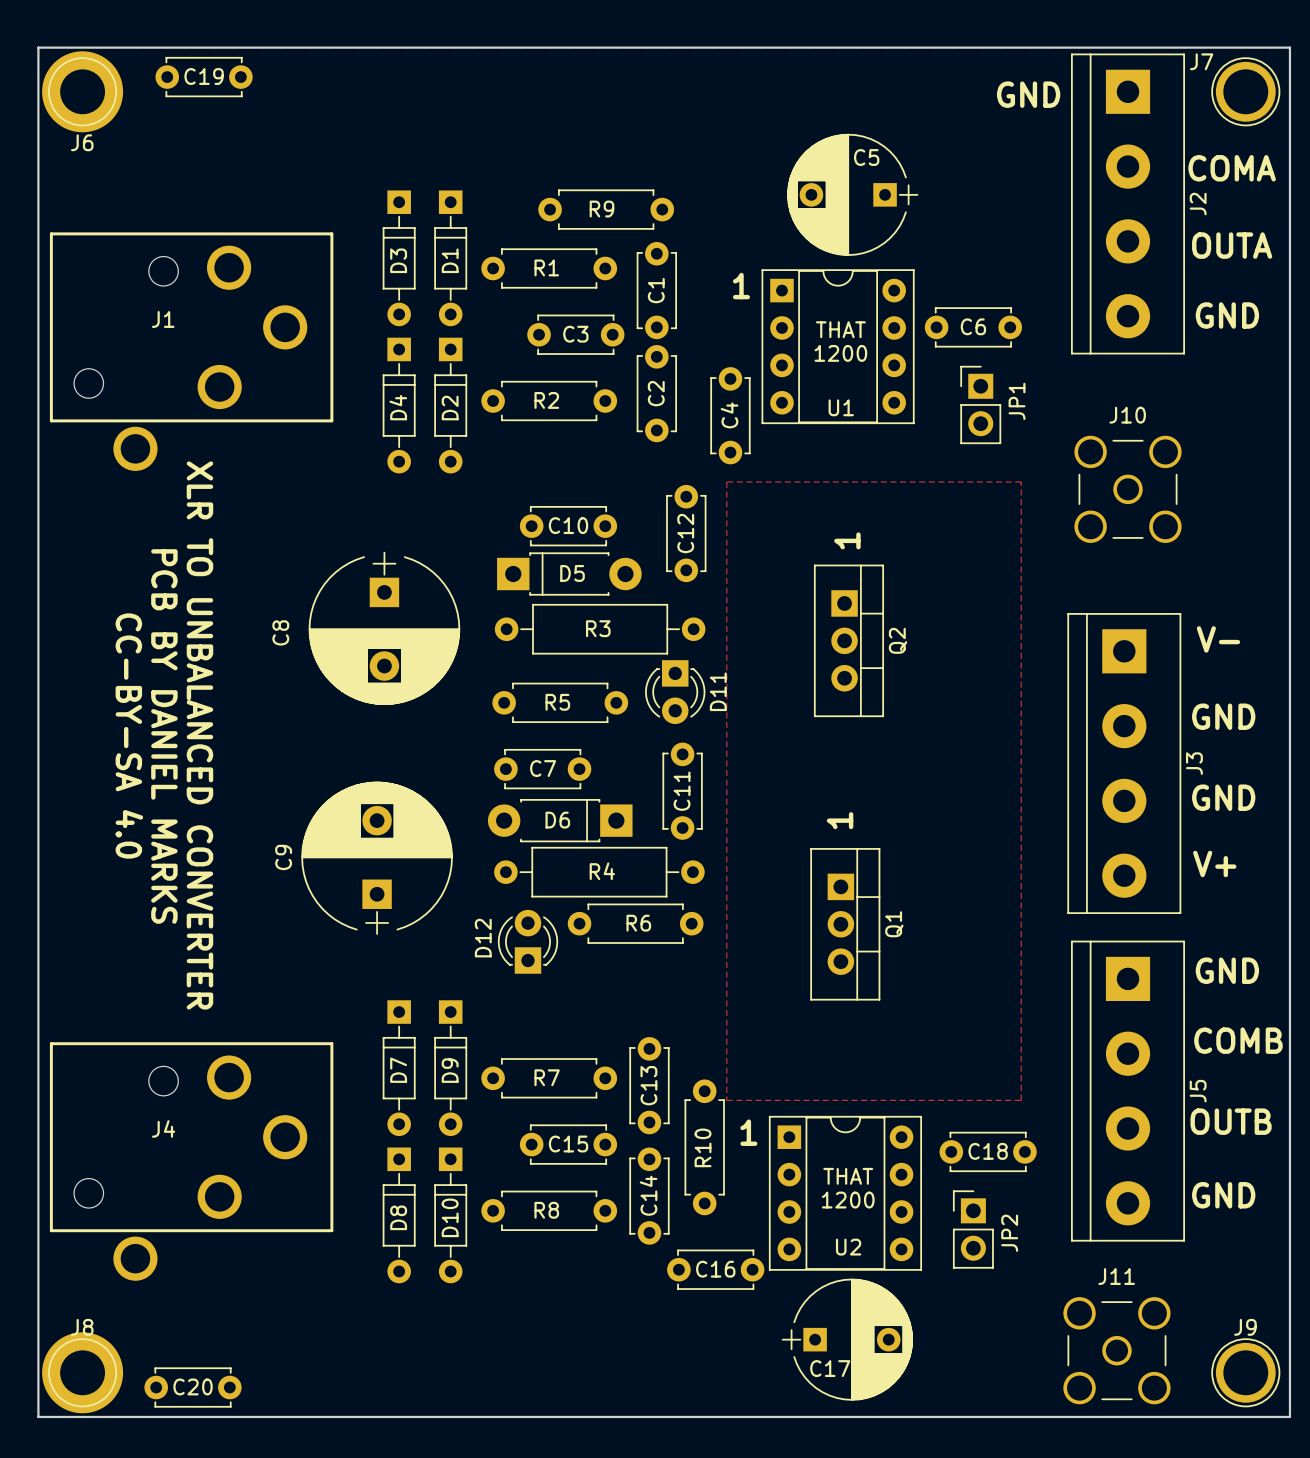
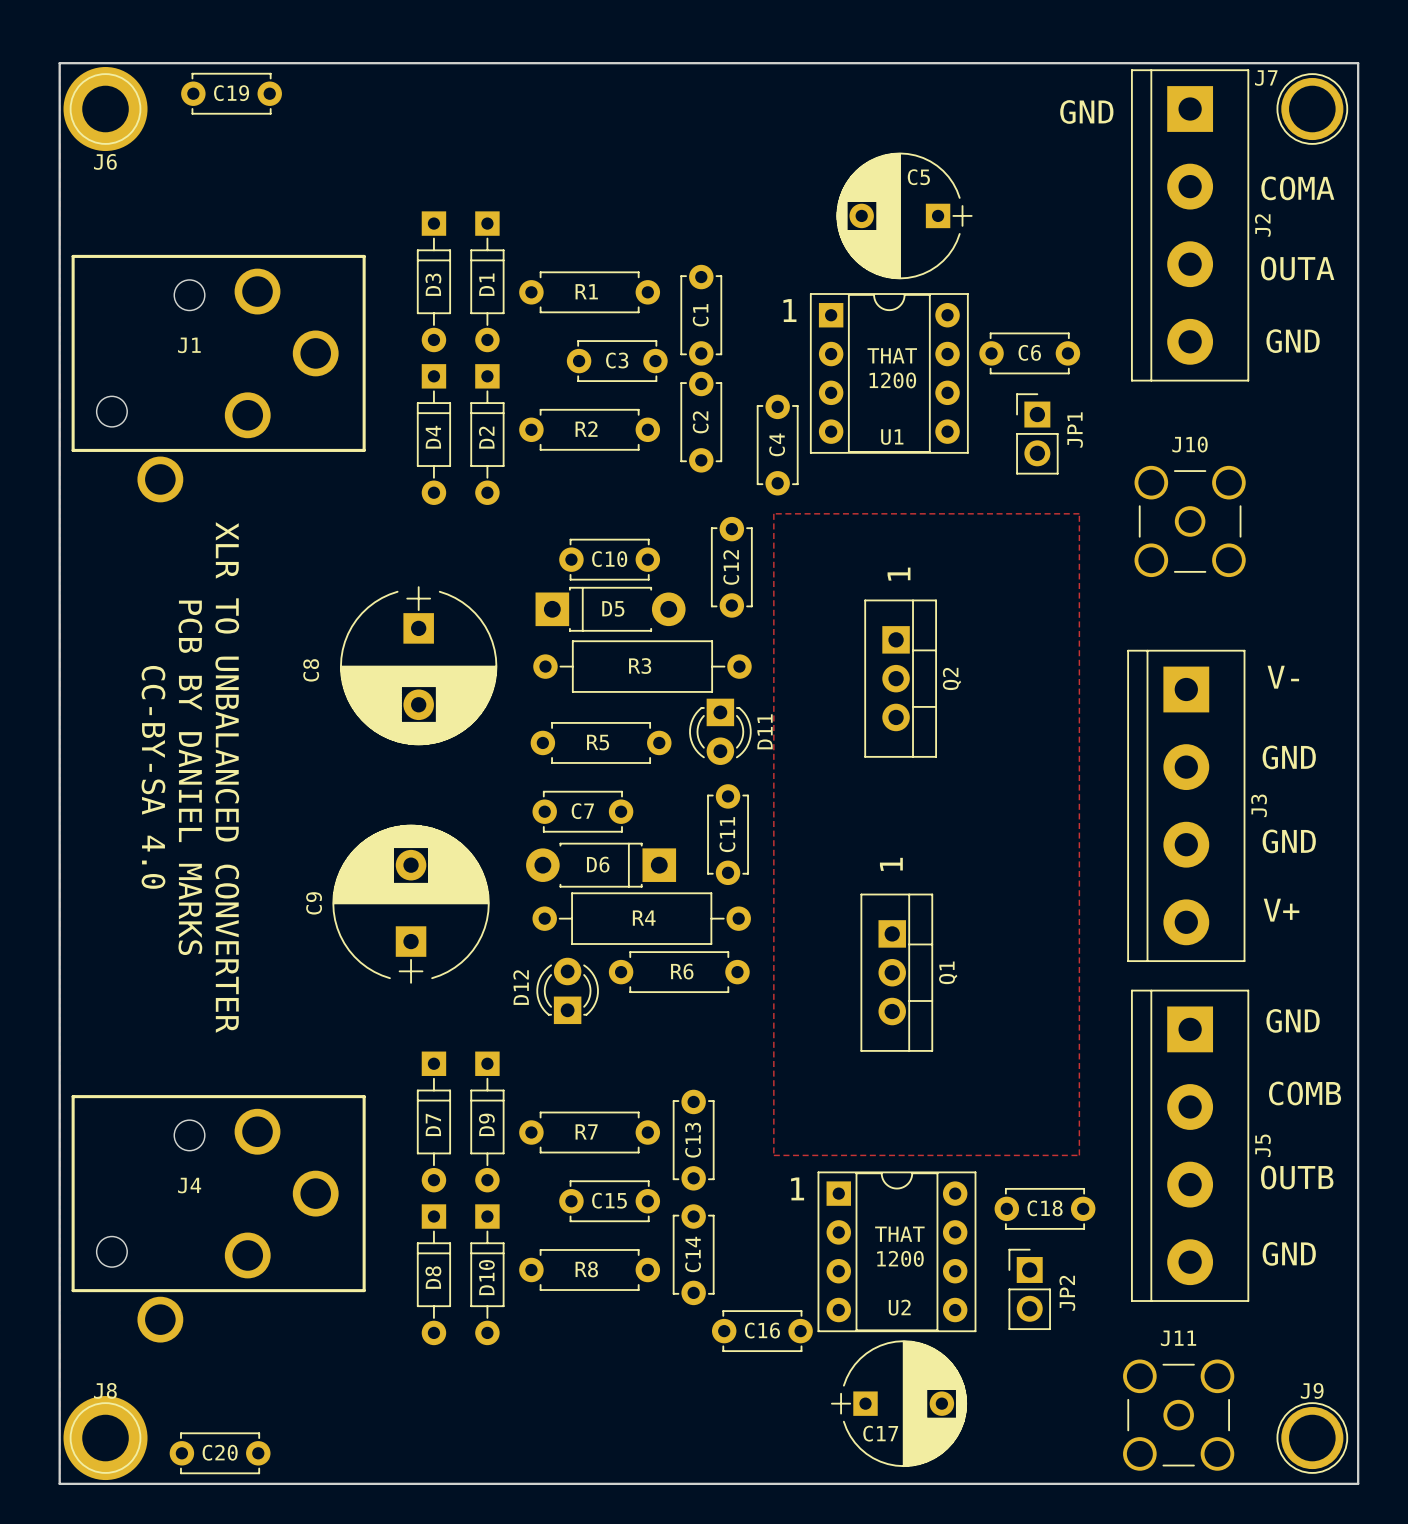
R9: (606, 209) -> none
R10: (704, 1147) -> none

